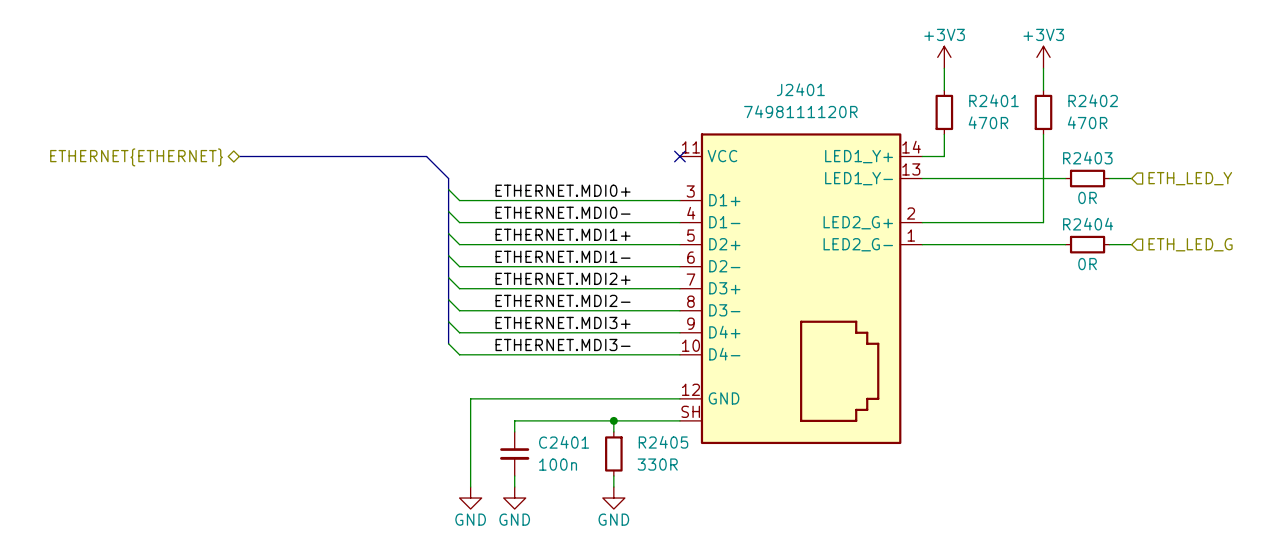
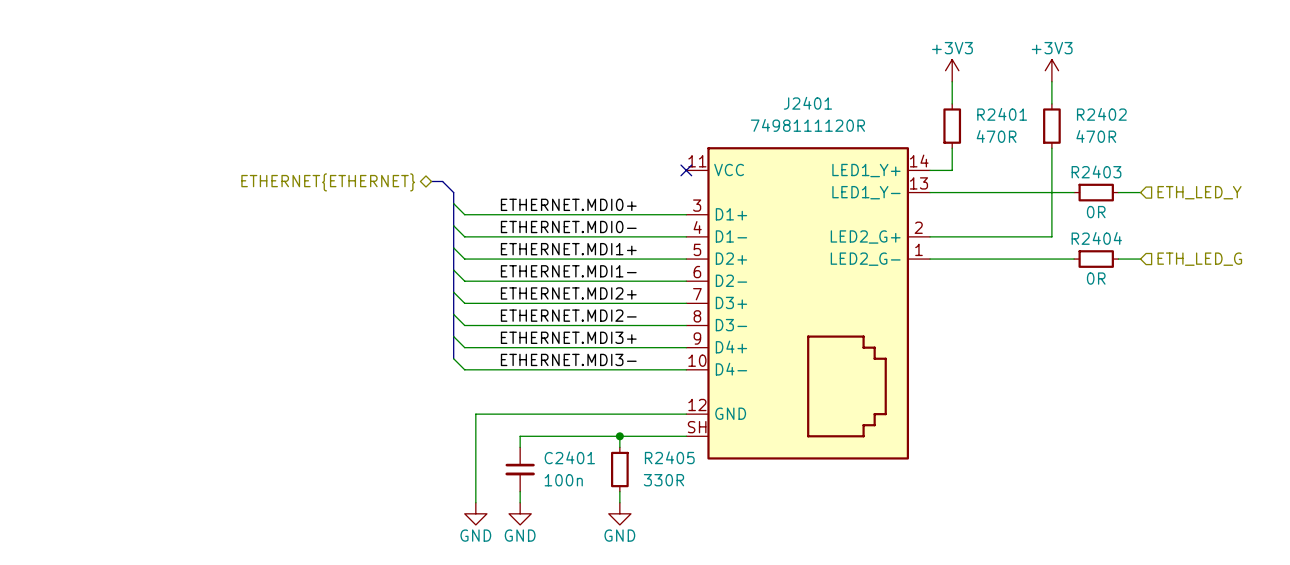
bus: (239, 156) (426, 156) (437, 167) -> (431, 181) (442, 181)
hierarchical label position: ETHERNET{ETHERNET} (136, 157) -> ETHERNET{ETHERNET} (328, 182)

